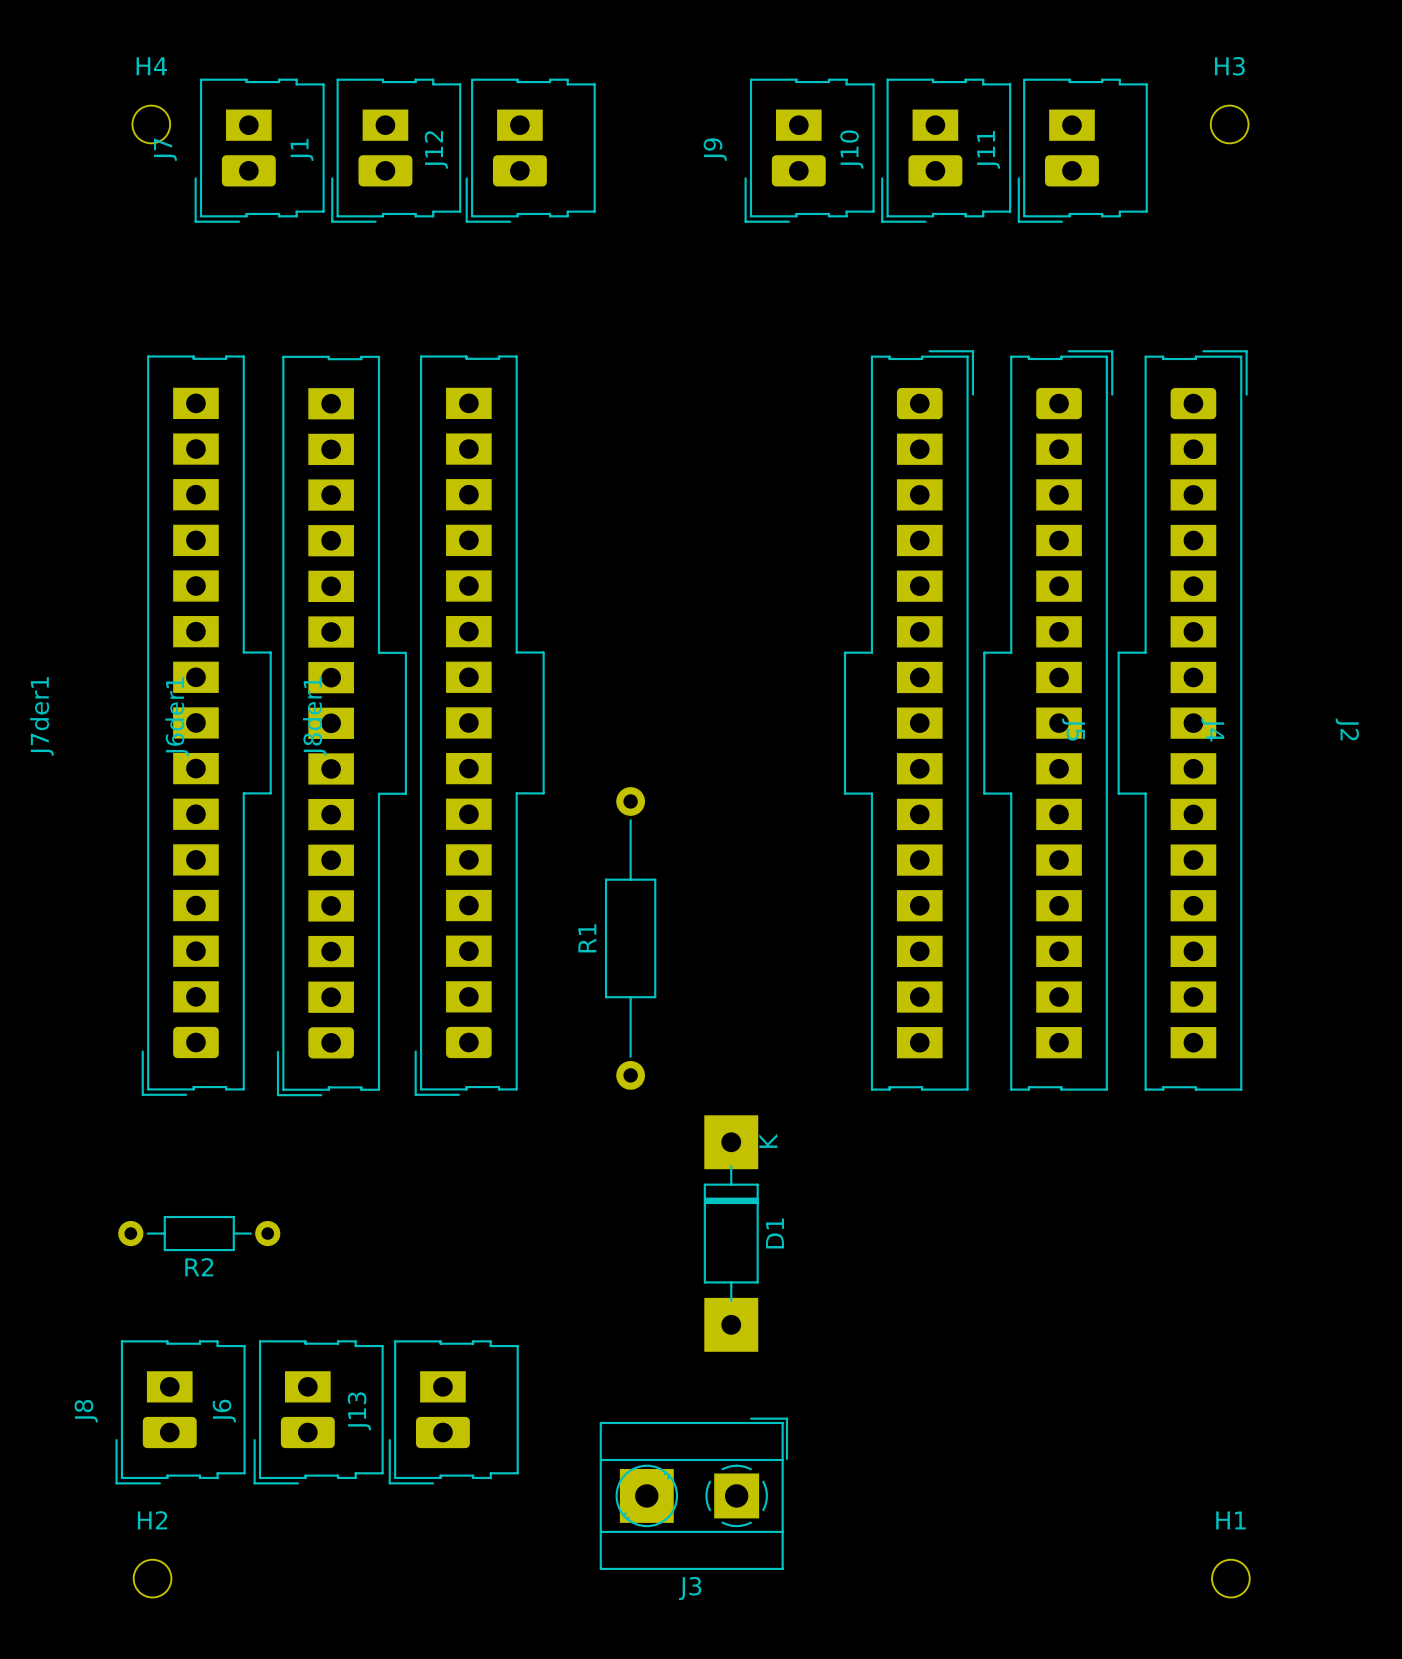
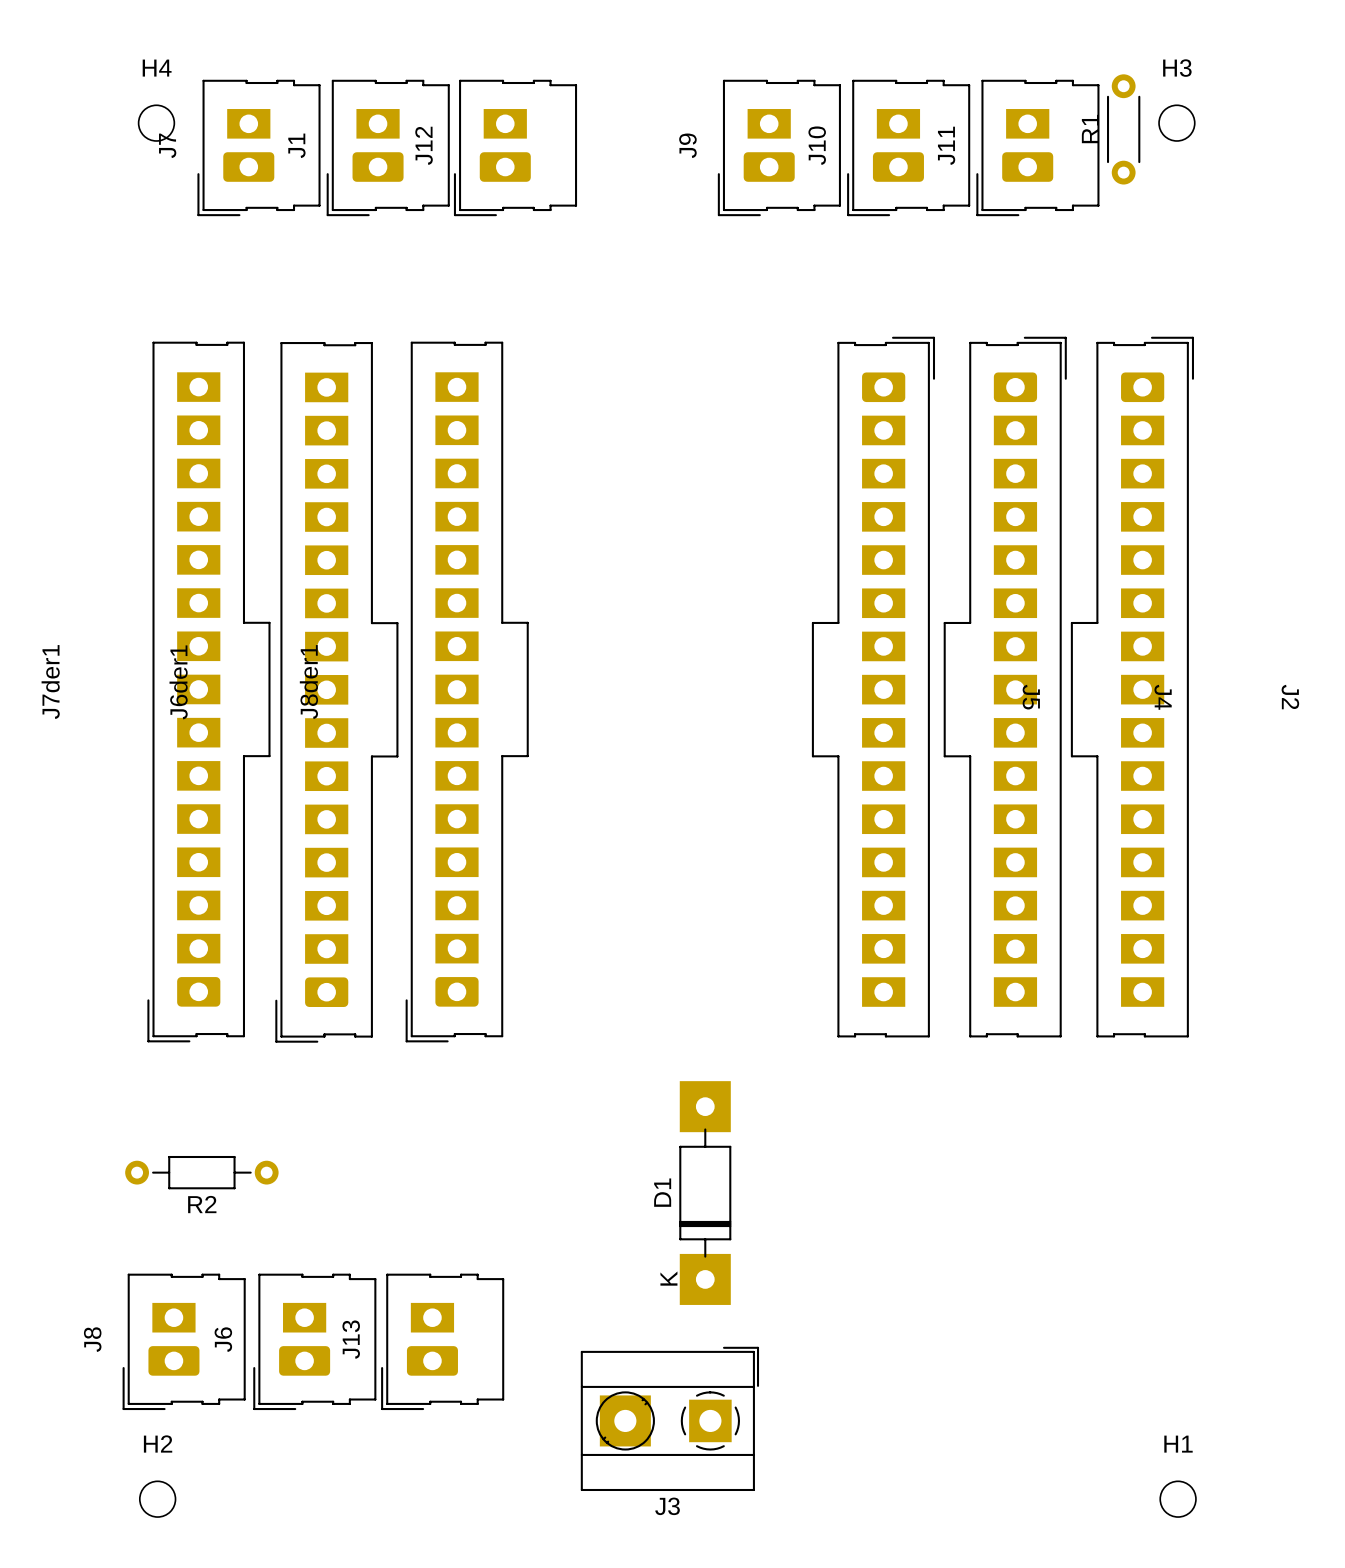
R1 footprint: [604, 787, 657, 1090] -> [1107, 74, 1141, 185]
D1 rotation: 0° (731, 1233) -> 180° (705, 1193)

